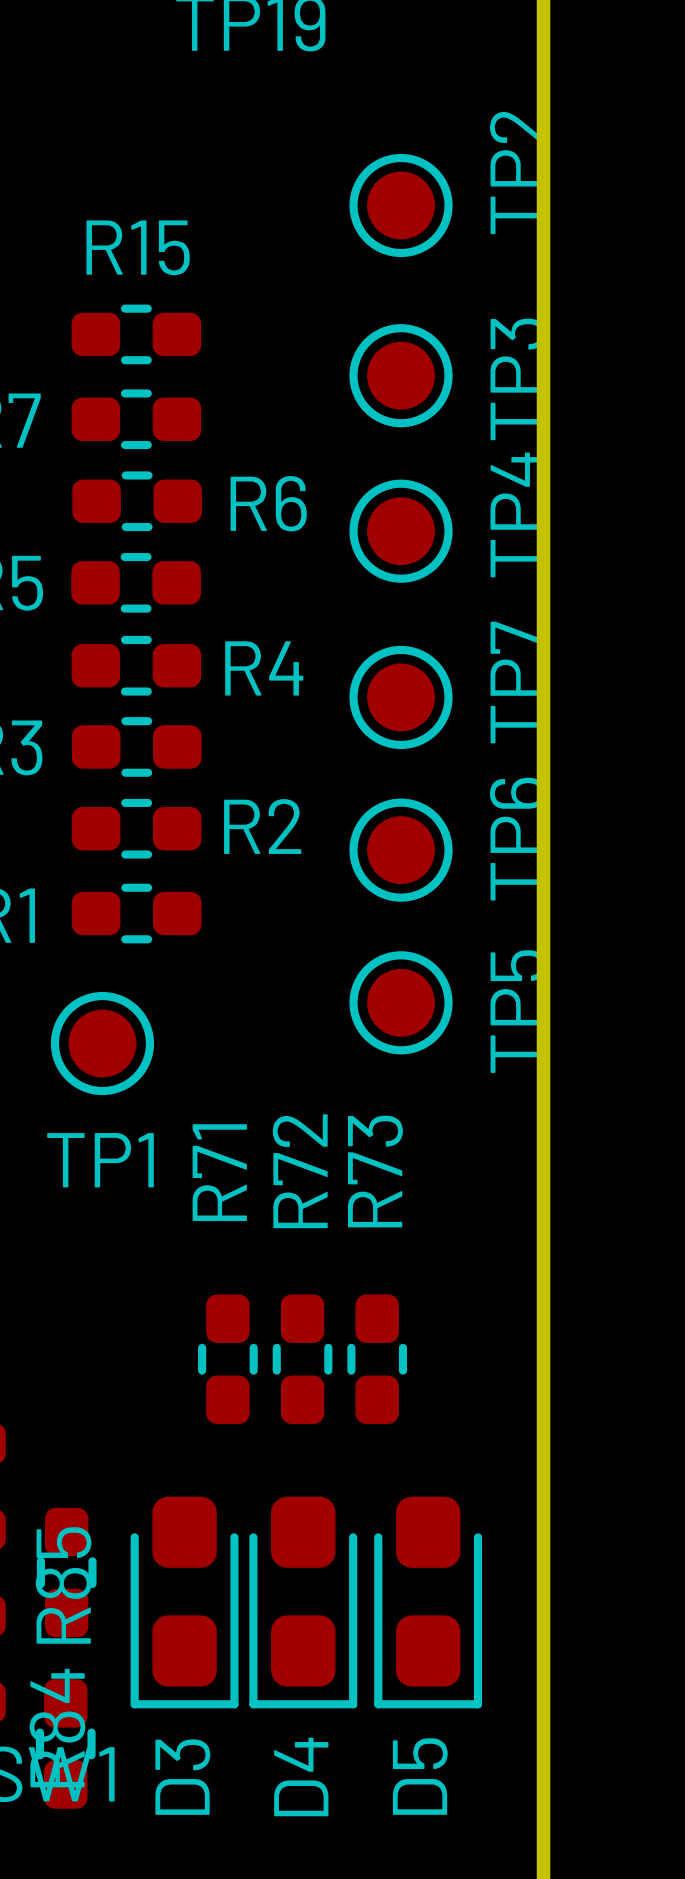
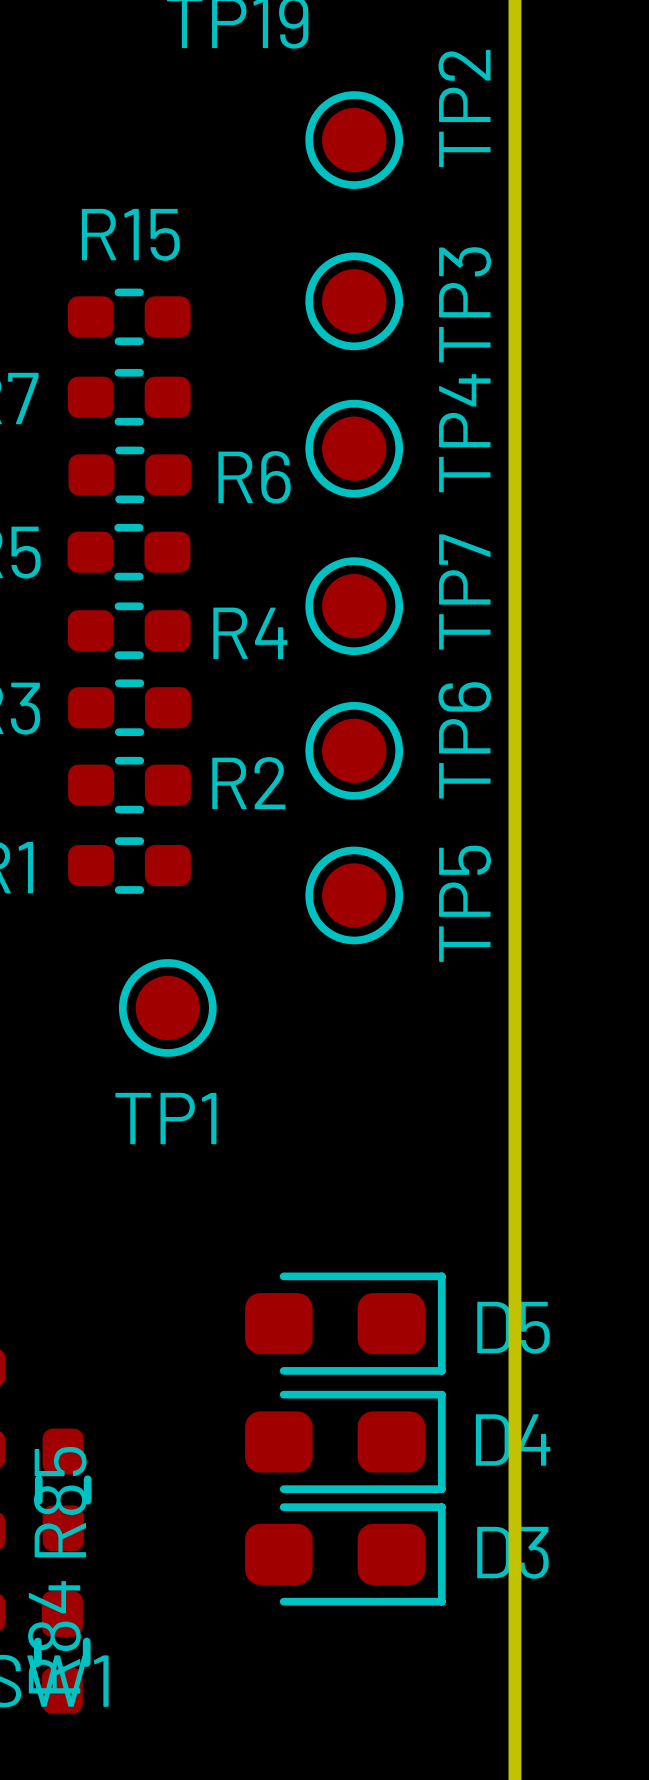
TP2 position: (401, 205) -> (354, 140)
TP3 position: (401, 375) -> (354, 301)
TP4 position: (401, 531) -> (354, 448)
TP7 position: (401, 697) -> (354, 606)
TP6 position: (401, 850) -> (354, 750)
TP5 position: (401, 1002) -> (354, 895)
TP1 position: (102, 1043) -> (167, 1007)
R71: (227, 1359) -> none
R72: (302, 1359) -> none
R73: (377, 1359) -> none
D3 rotation: 0° (184, 1602) -> 90° counterclockwise (345, 1554)
D3 position: (184, 1602) -> (345, 1554)
D4 rotation: 0° (303, 1602) -> 90° counterclockwise (345, 1441)
D5 rotation: 0° (428, 1602) -> 90° counterclockwise (345, 1323)
D5 position: (428, 1602) -> (345, 1323)

